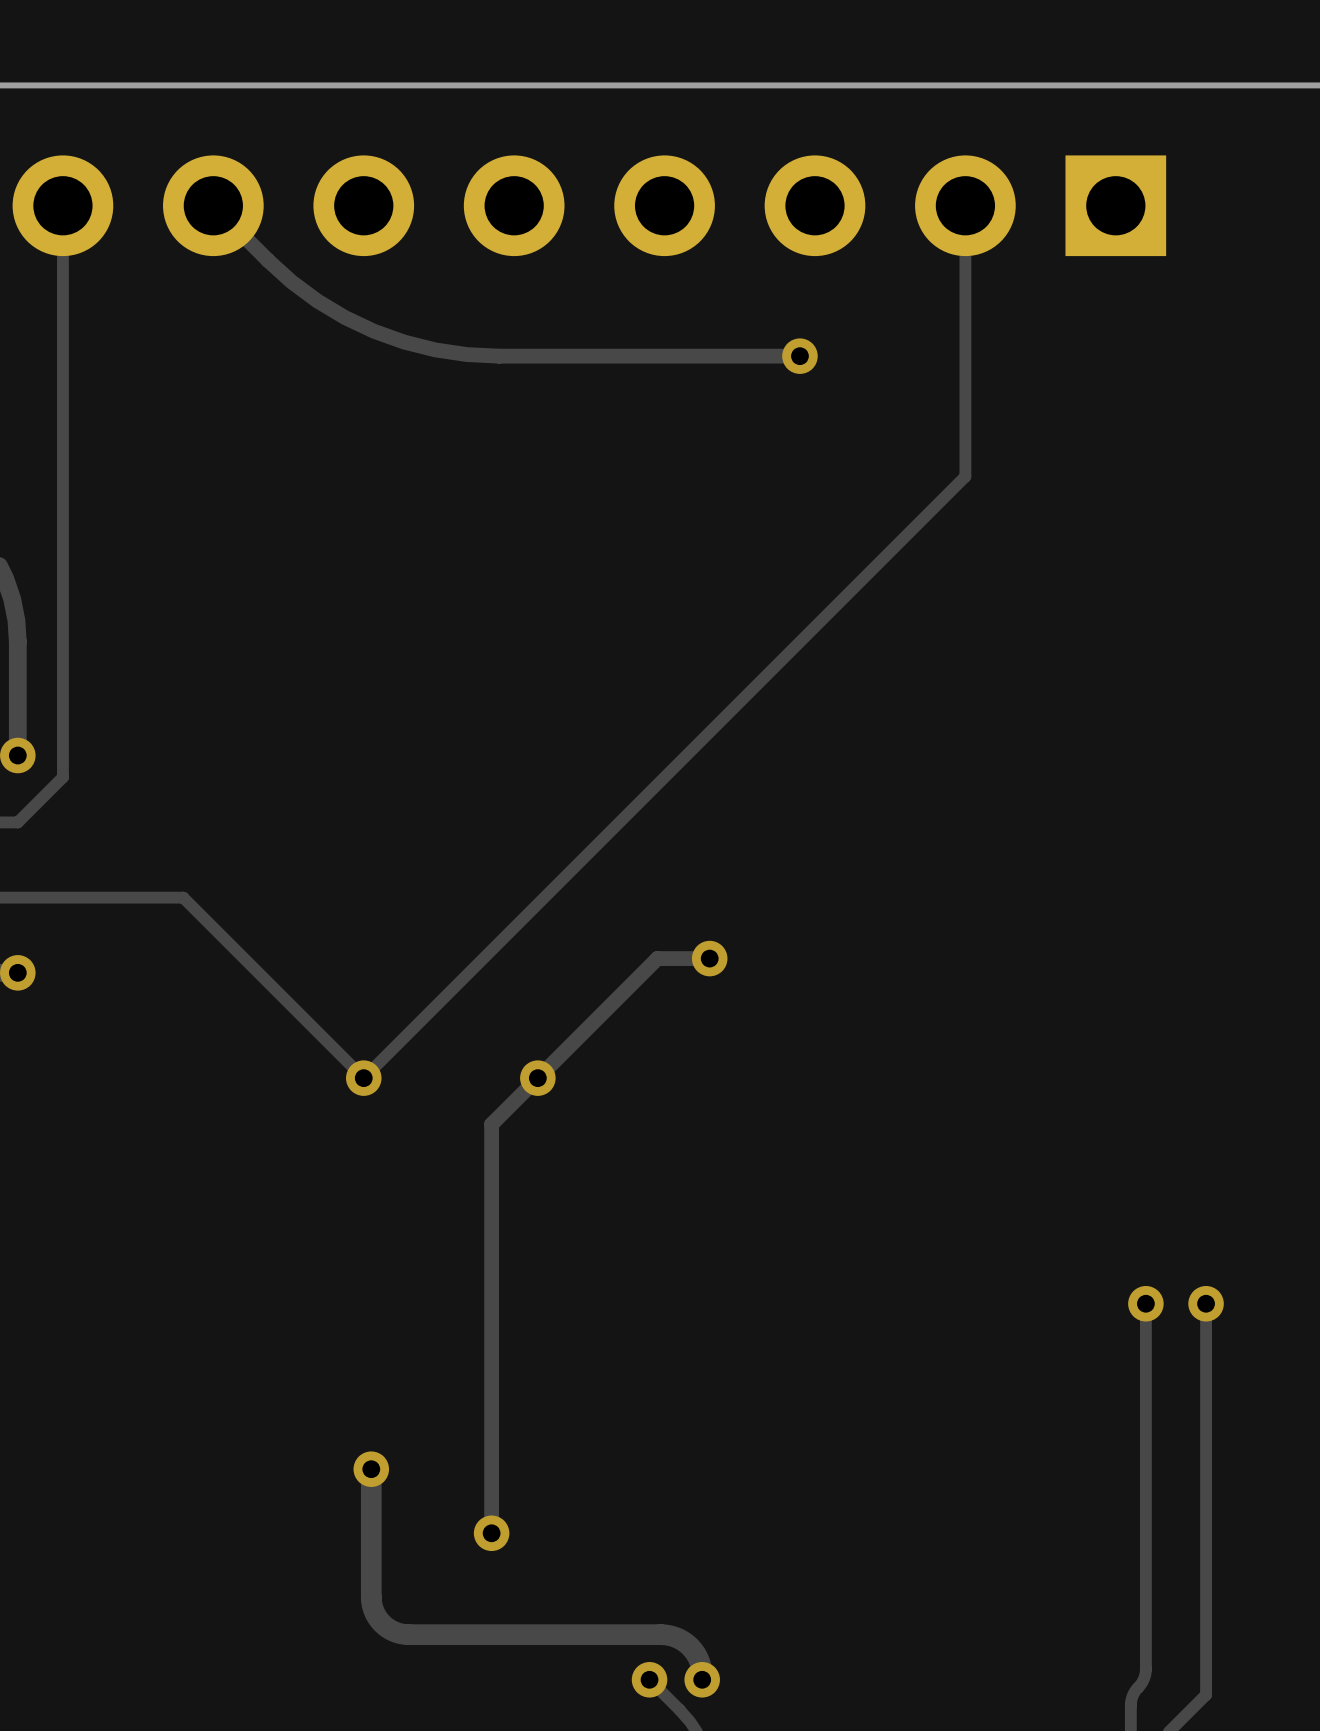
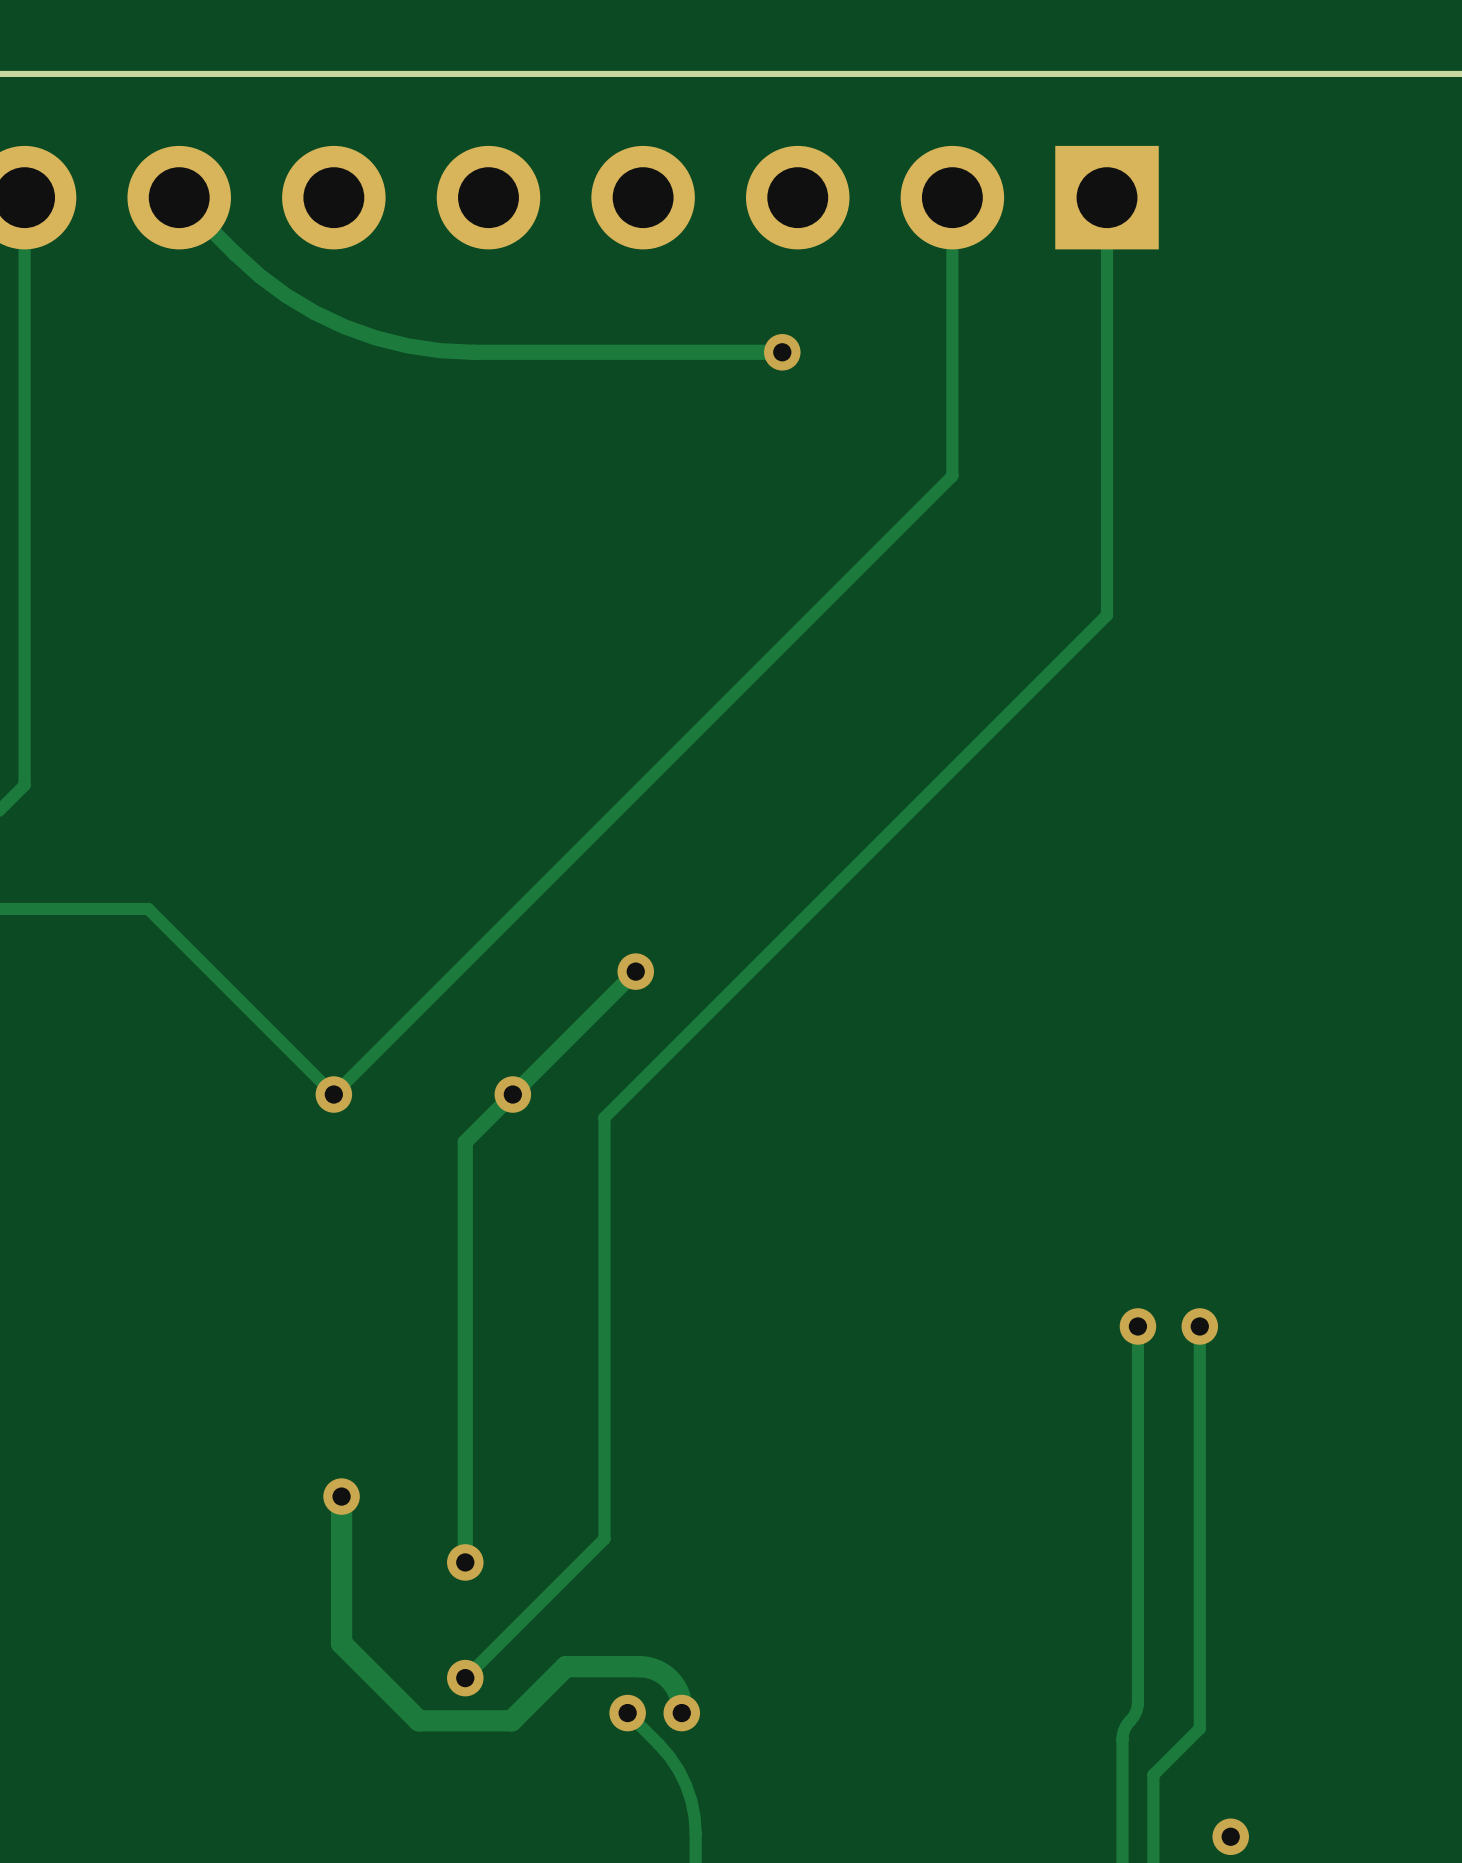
track: none -> (1107, 197) (1107, 615) (604, 1117) (604, 1538) (465, 1678)
track: (709, 958) (657, 958) -> none
via position: (709, 958) -> (635, 971)
track: (371, 1597) (373, 1609) (379, 1620) (388, 1628) (400, 1633) (589, 1634) -> (341, 1628) (341, 1643) (418, 1720) (511, 1720) (565, 1666)
via: none -> (465, 1678)

